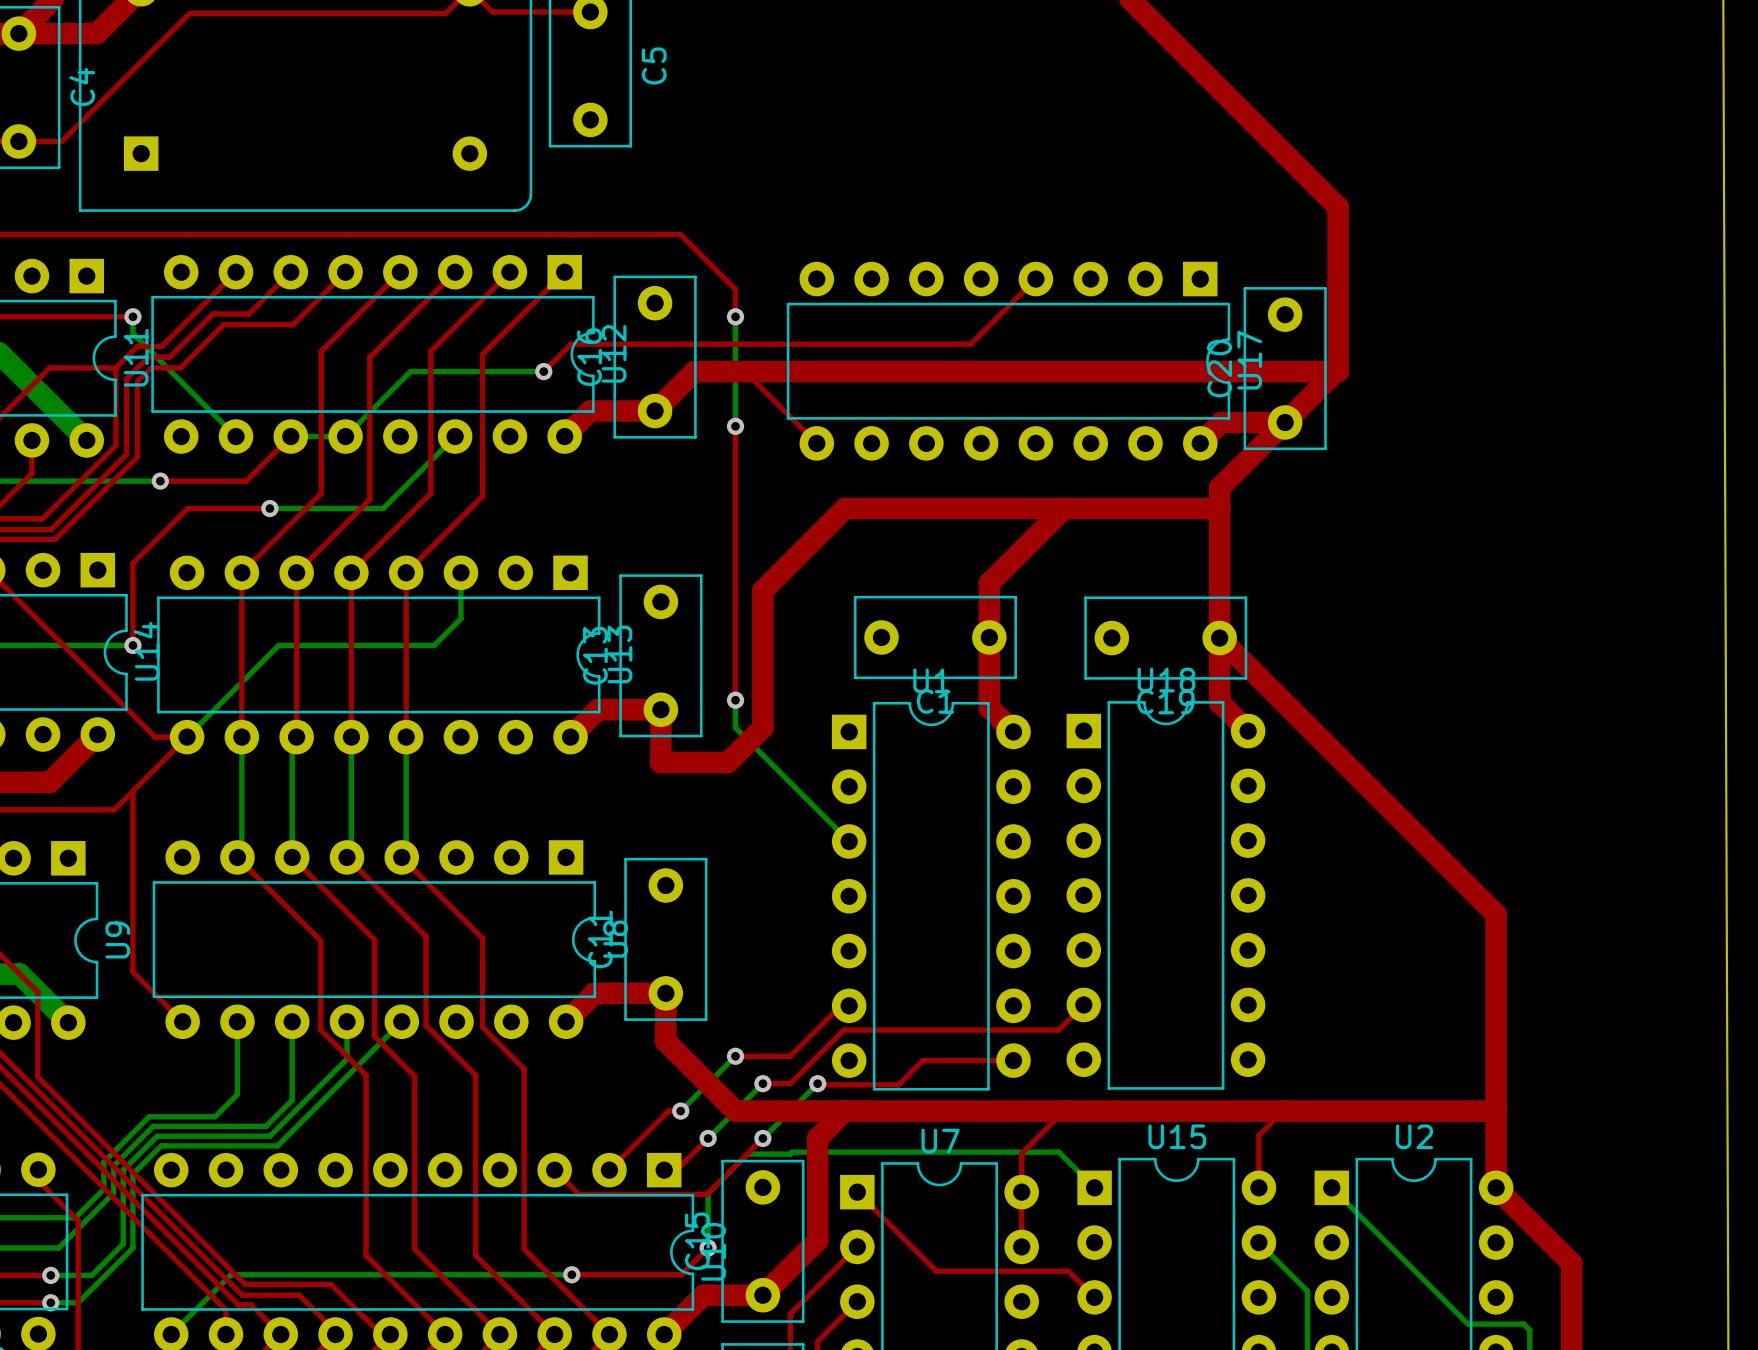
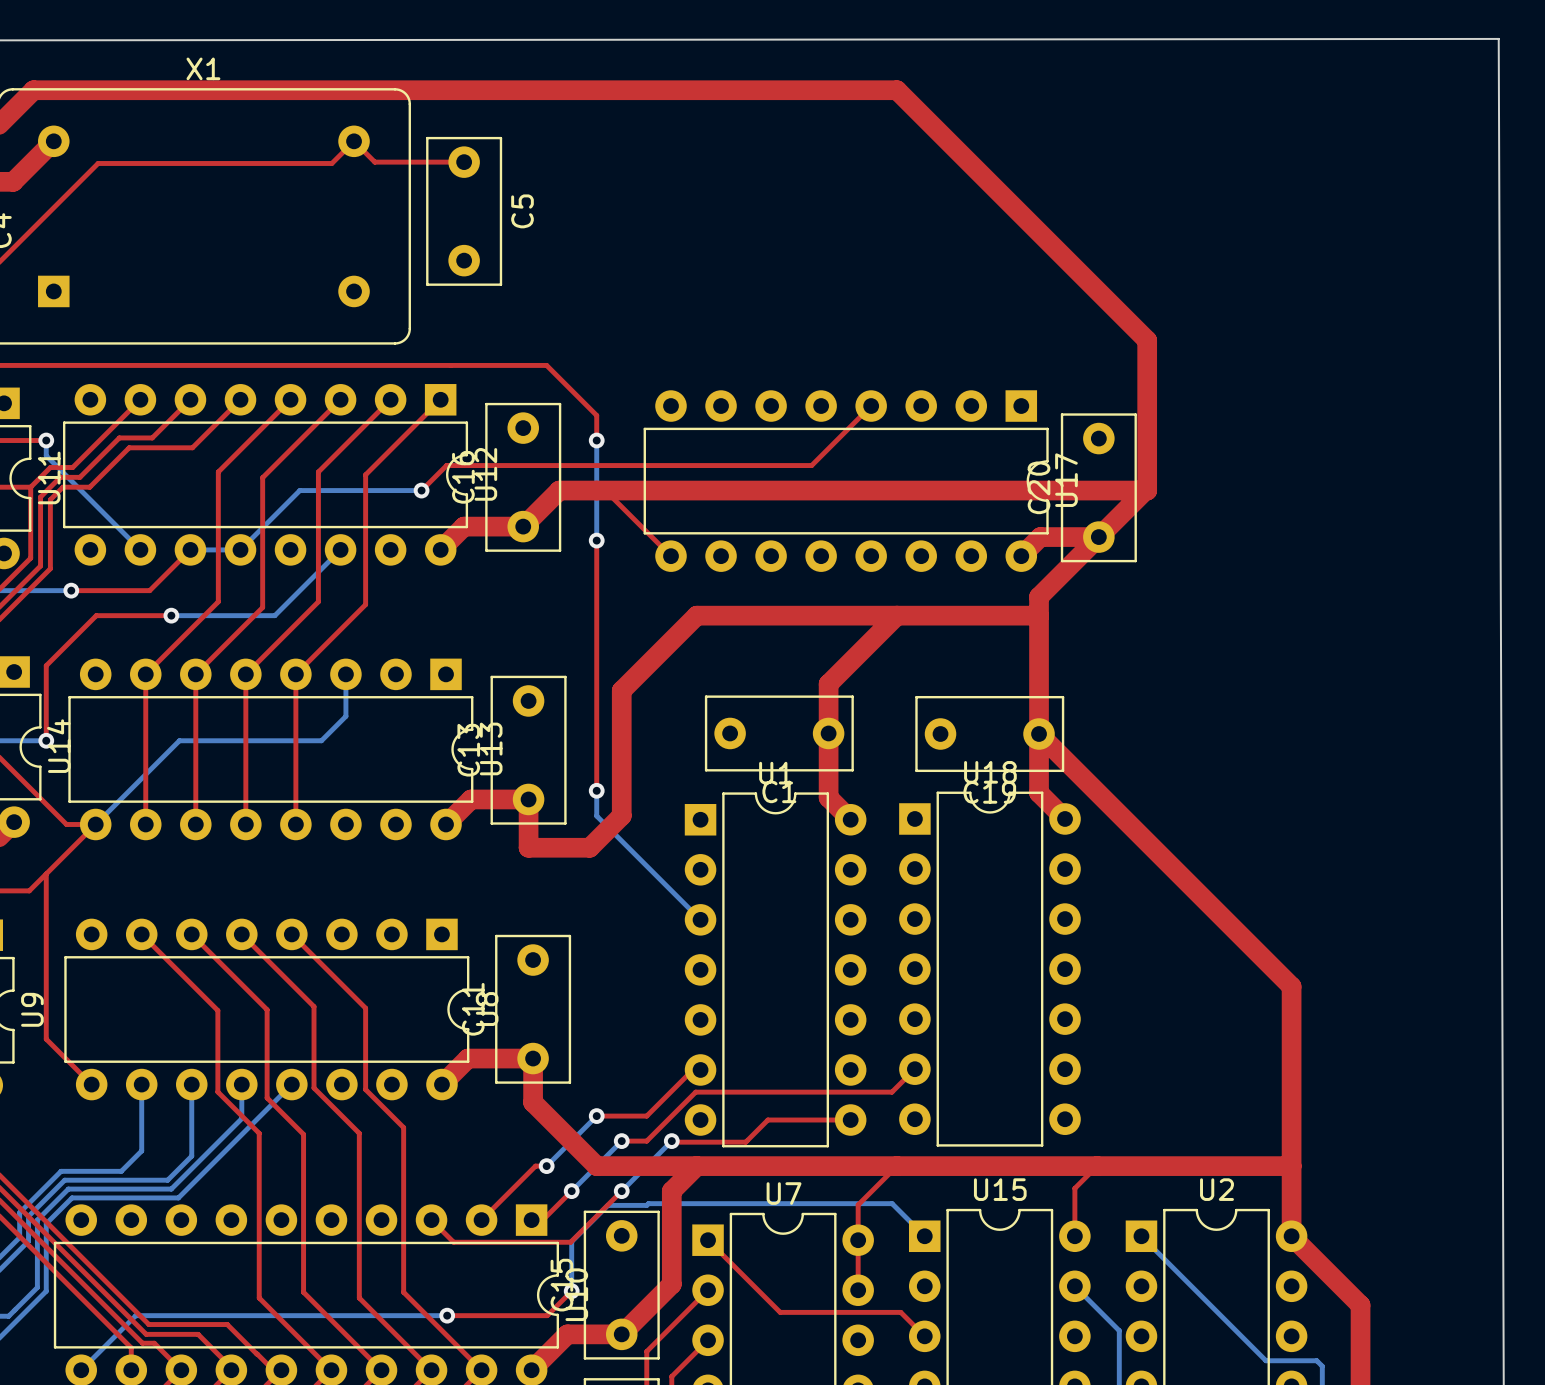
bottom track: (241, 737) (241, 853) (237, 857) -> none
bottom track: (296, 737) (292, 741) (292, 857) -> none
bottom track: (351, 737) (351, 853) (347, 857) -> none
bottom track: (406, 737) (406, 853) (401, 857) -> none

